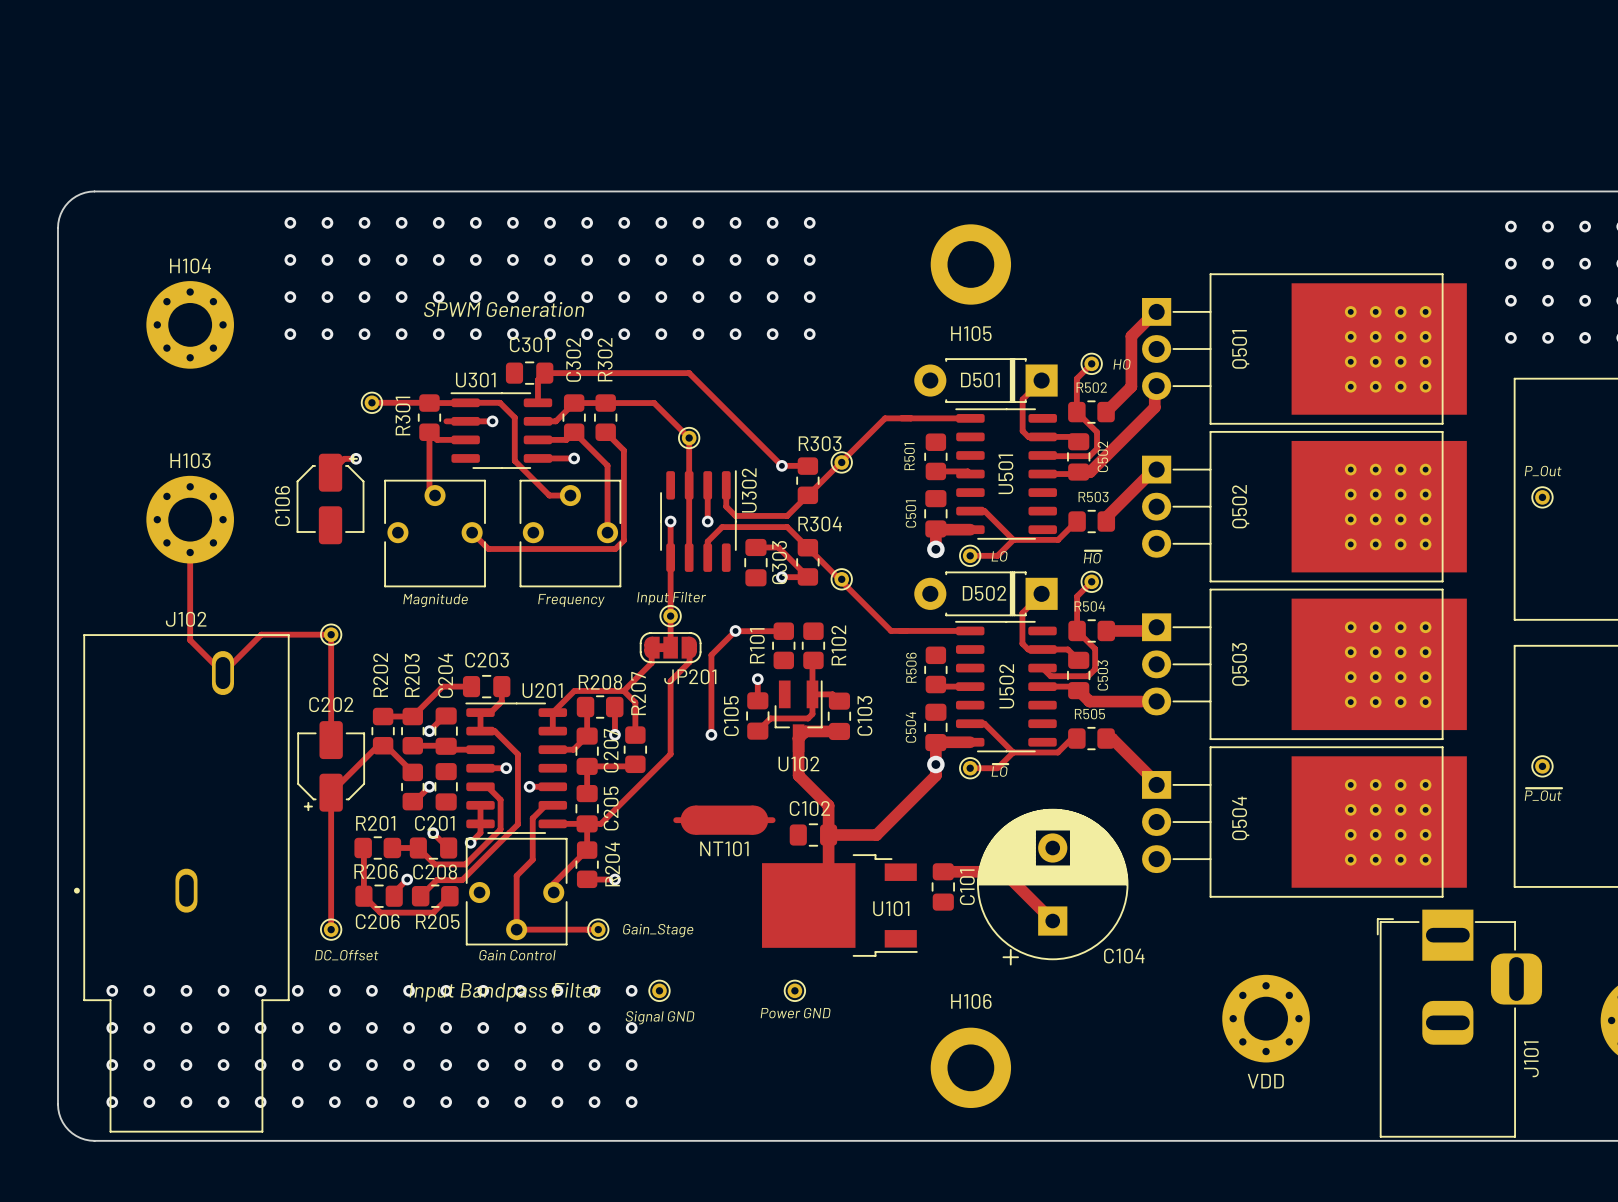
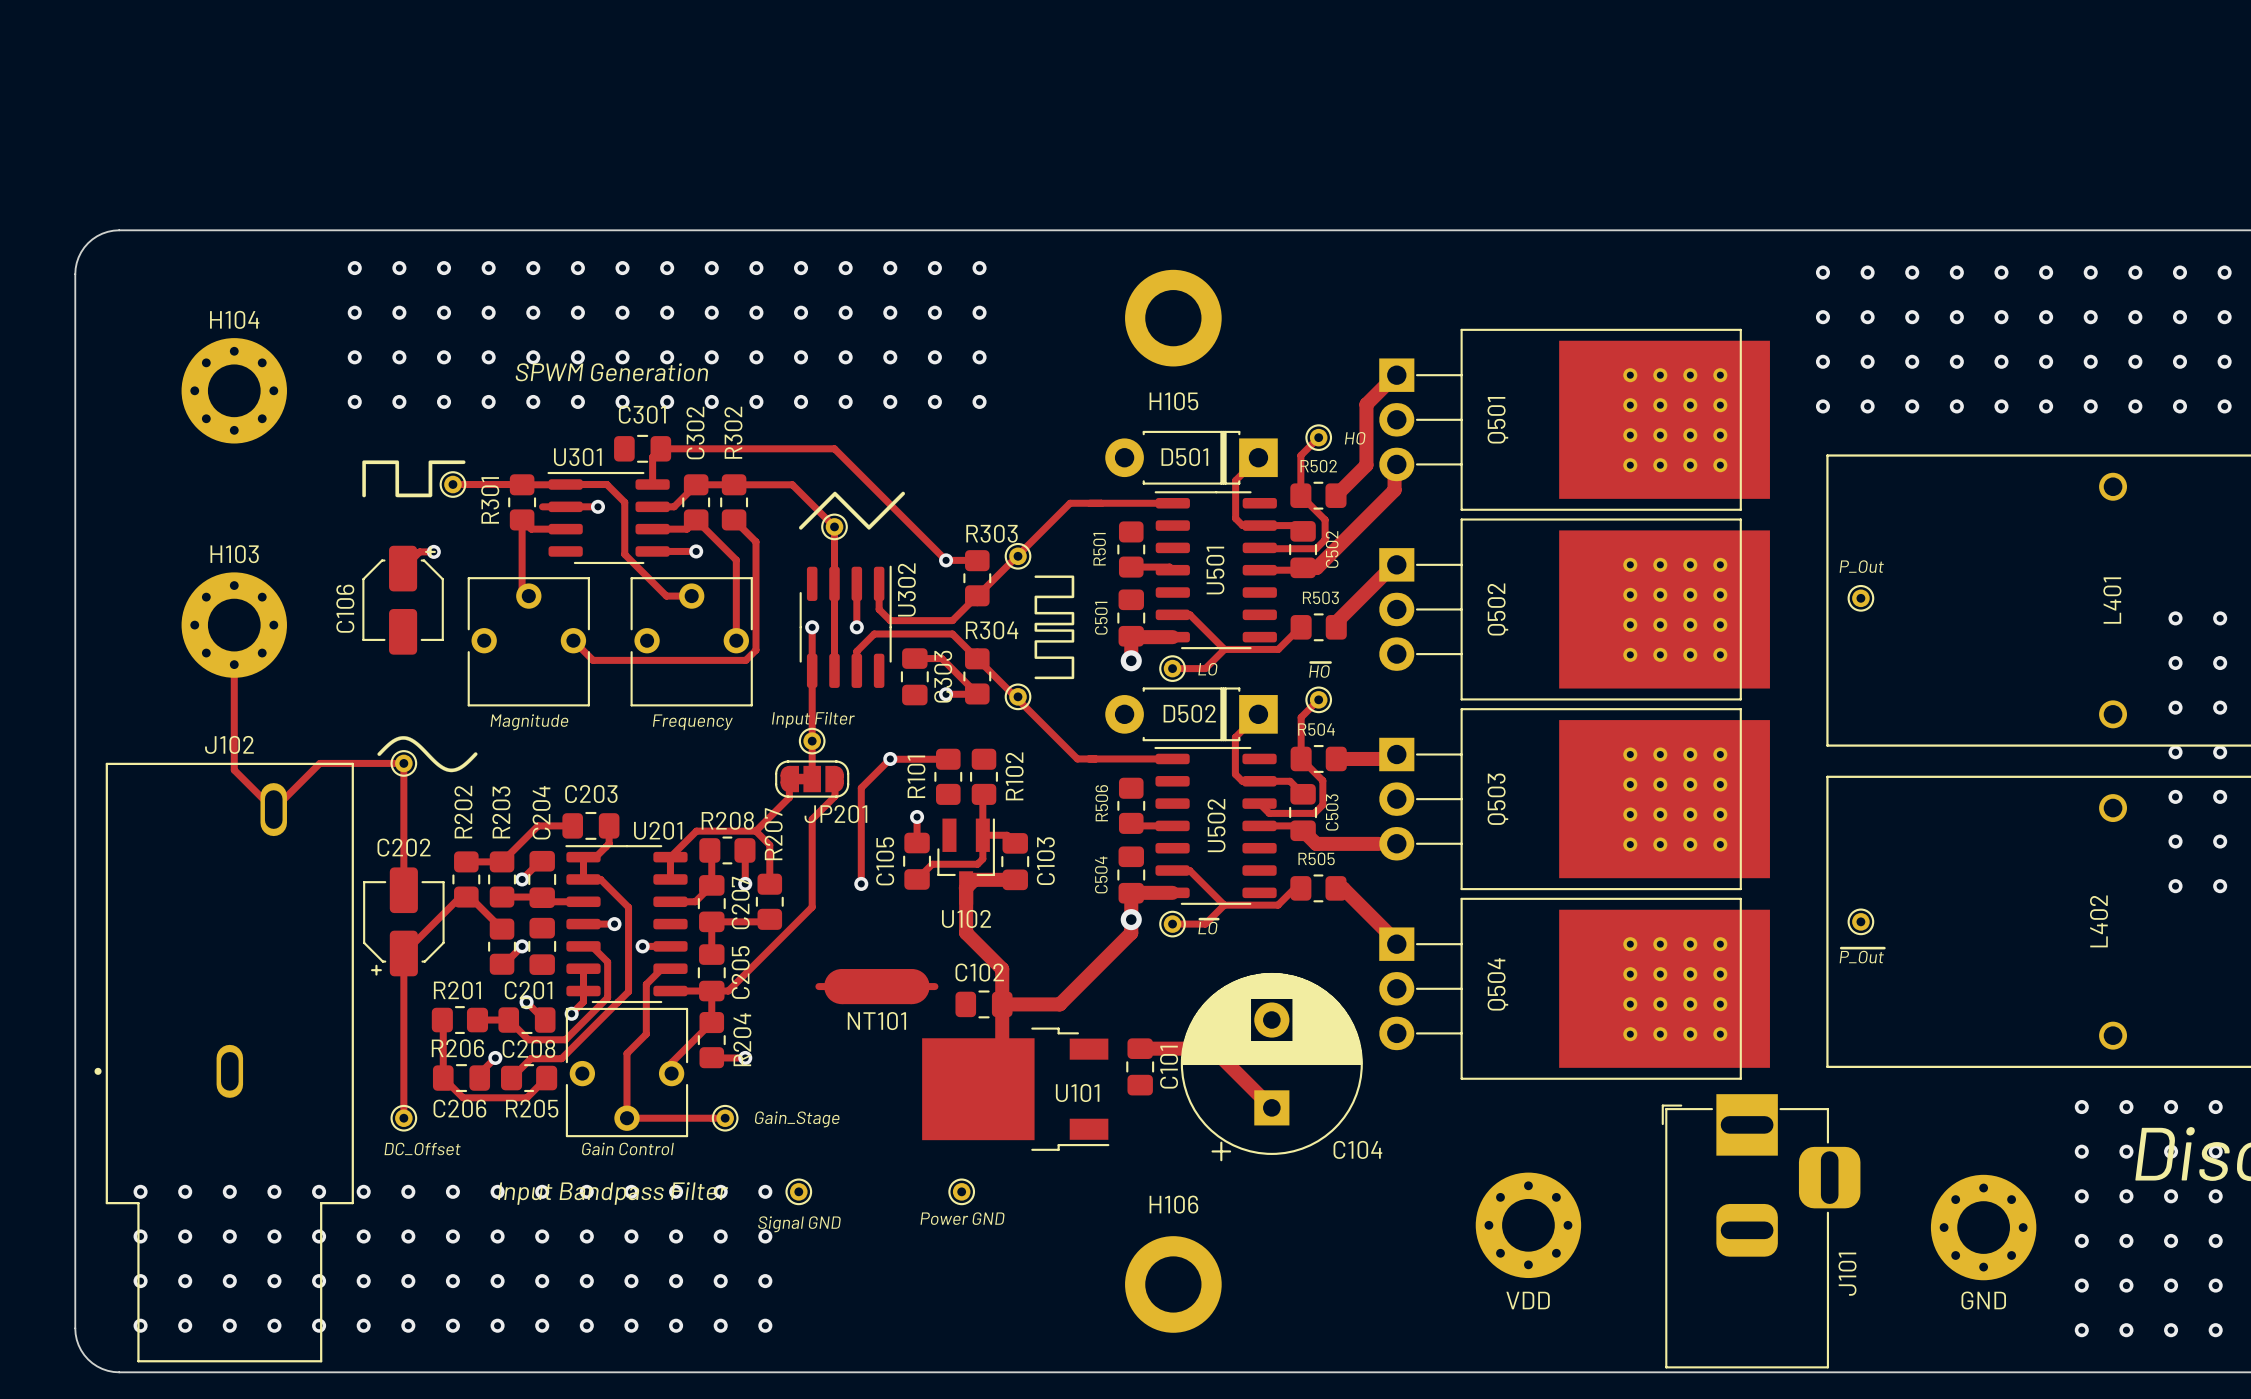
drawing: none -> [362, 460, 466, 498]
drawing: none -> [799, 491, 906, 530]
drawing: none -> [1034, 575, 1075, 680]
drawing: none -> [377, 736, 478, 773]

